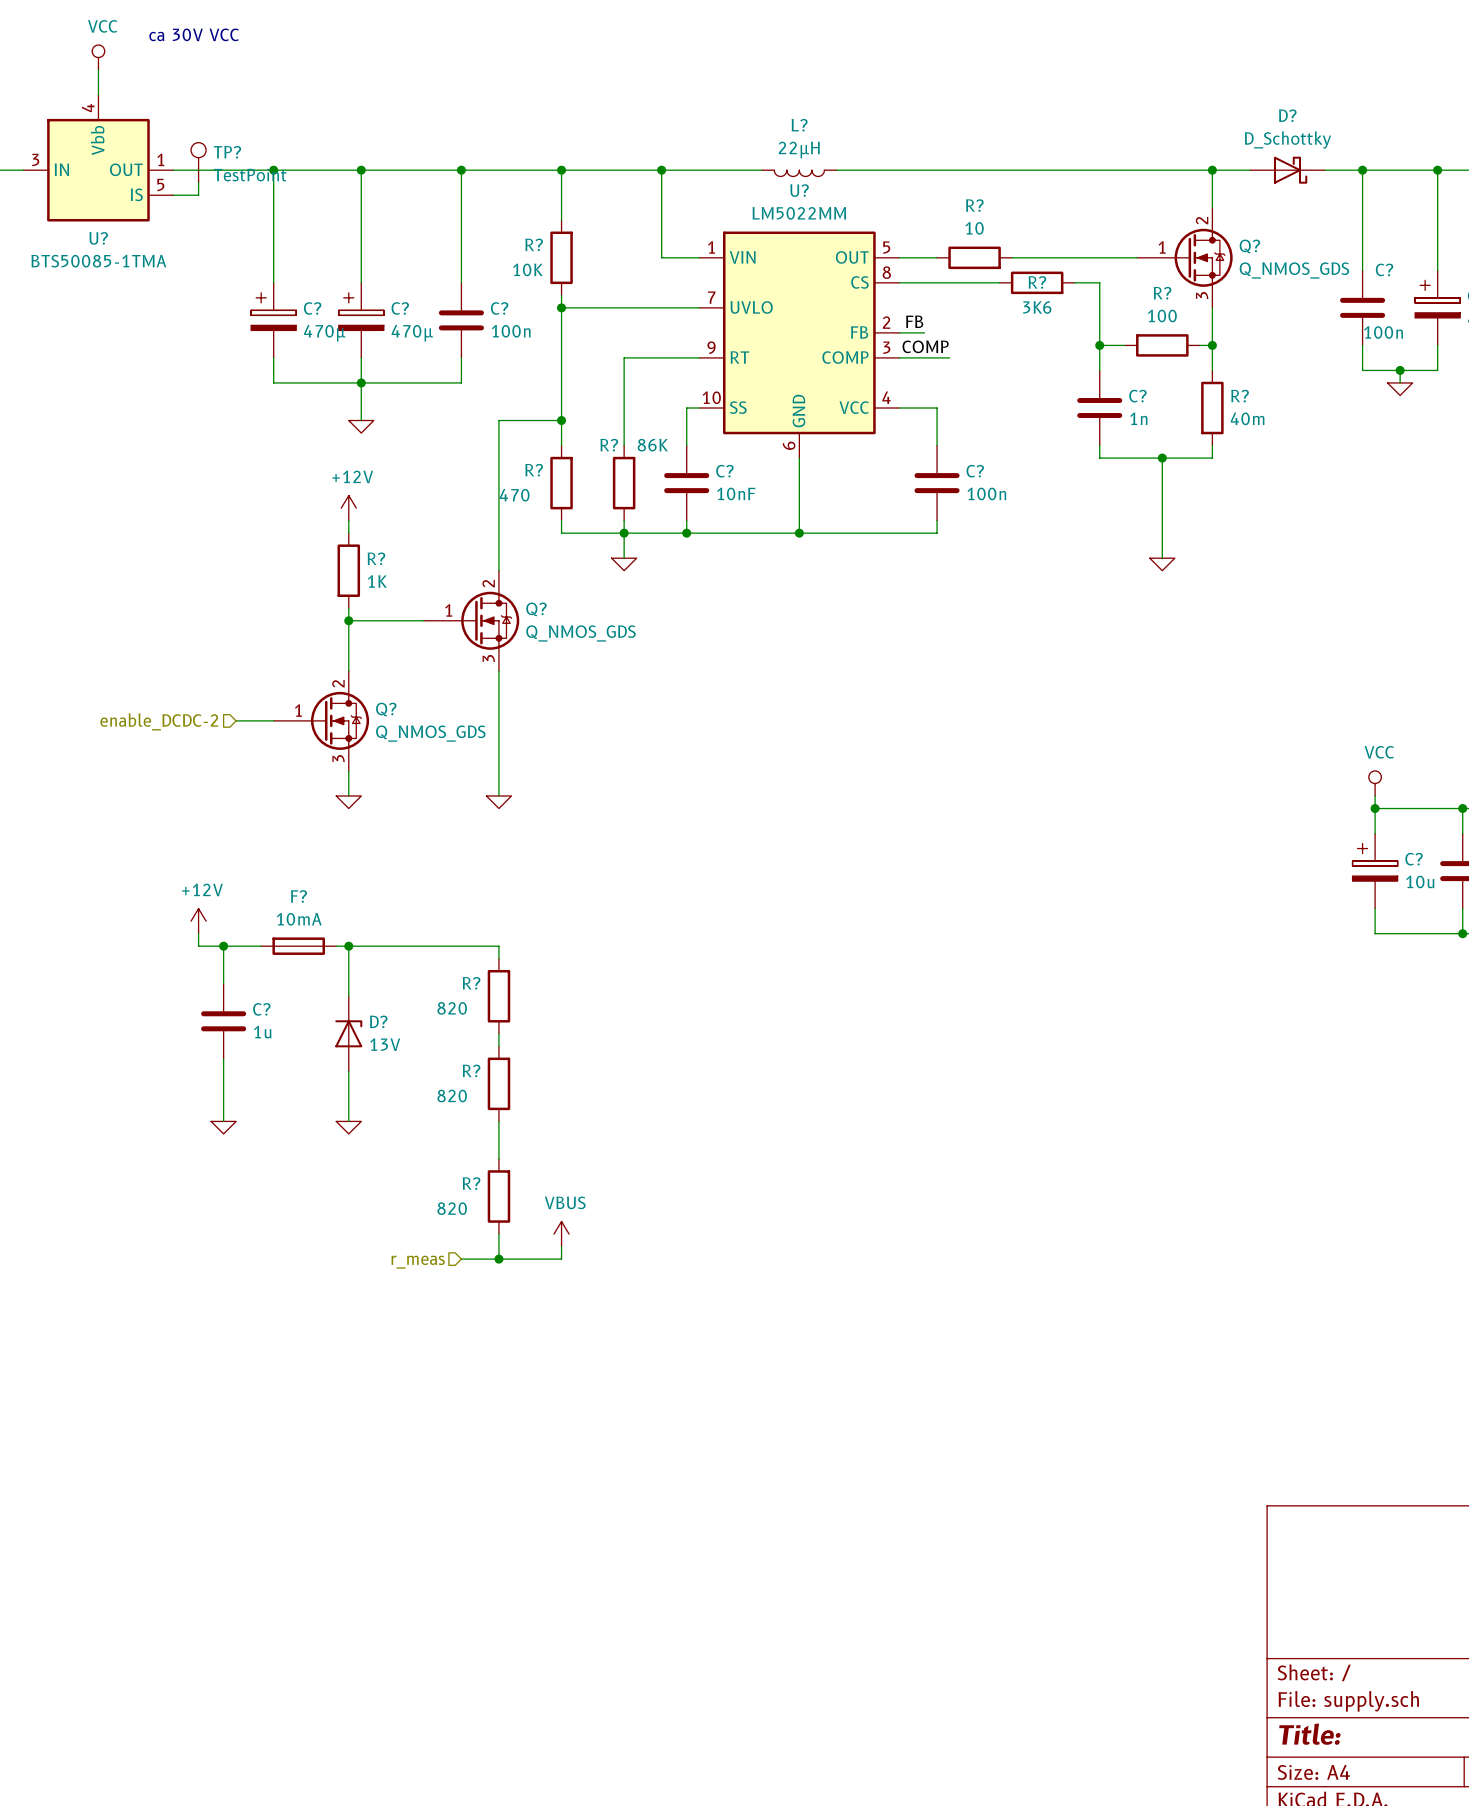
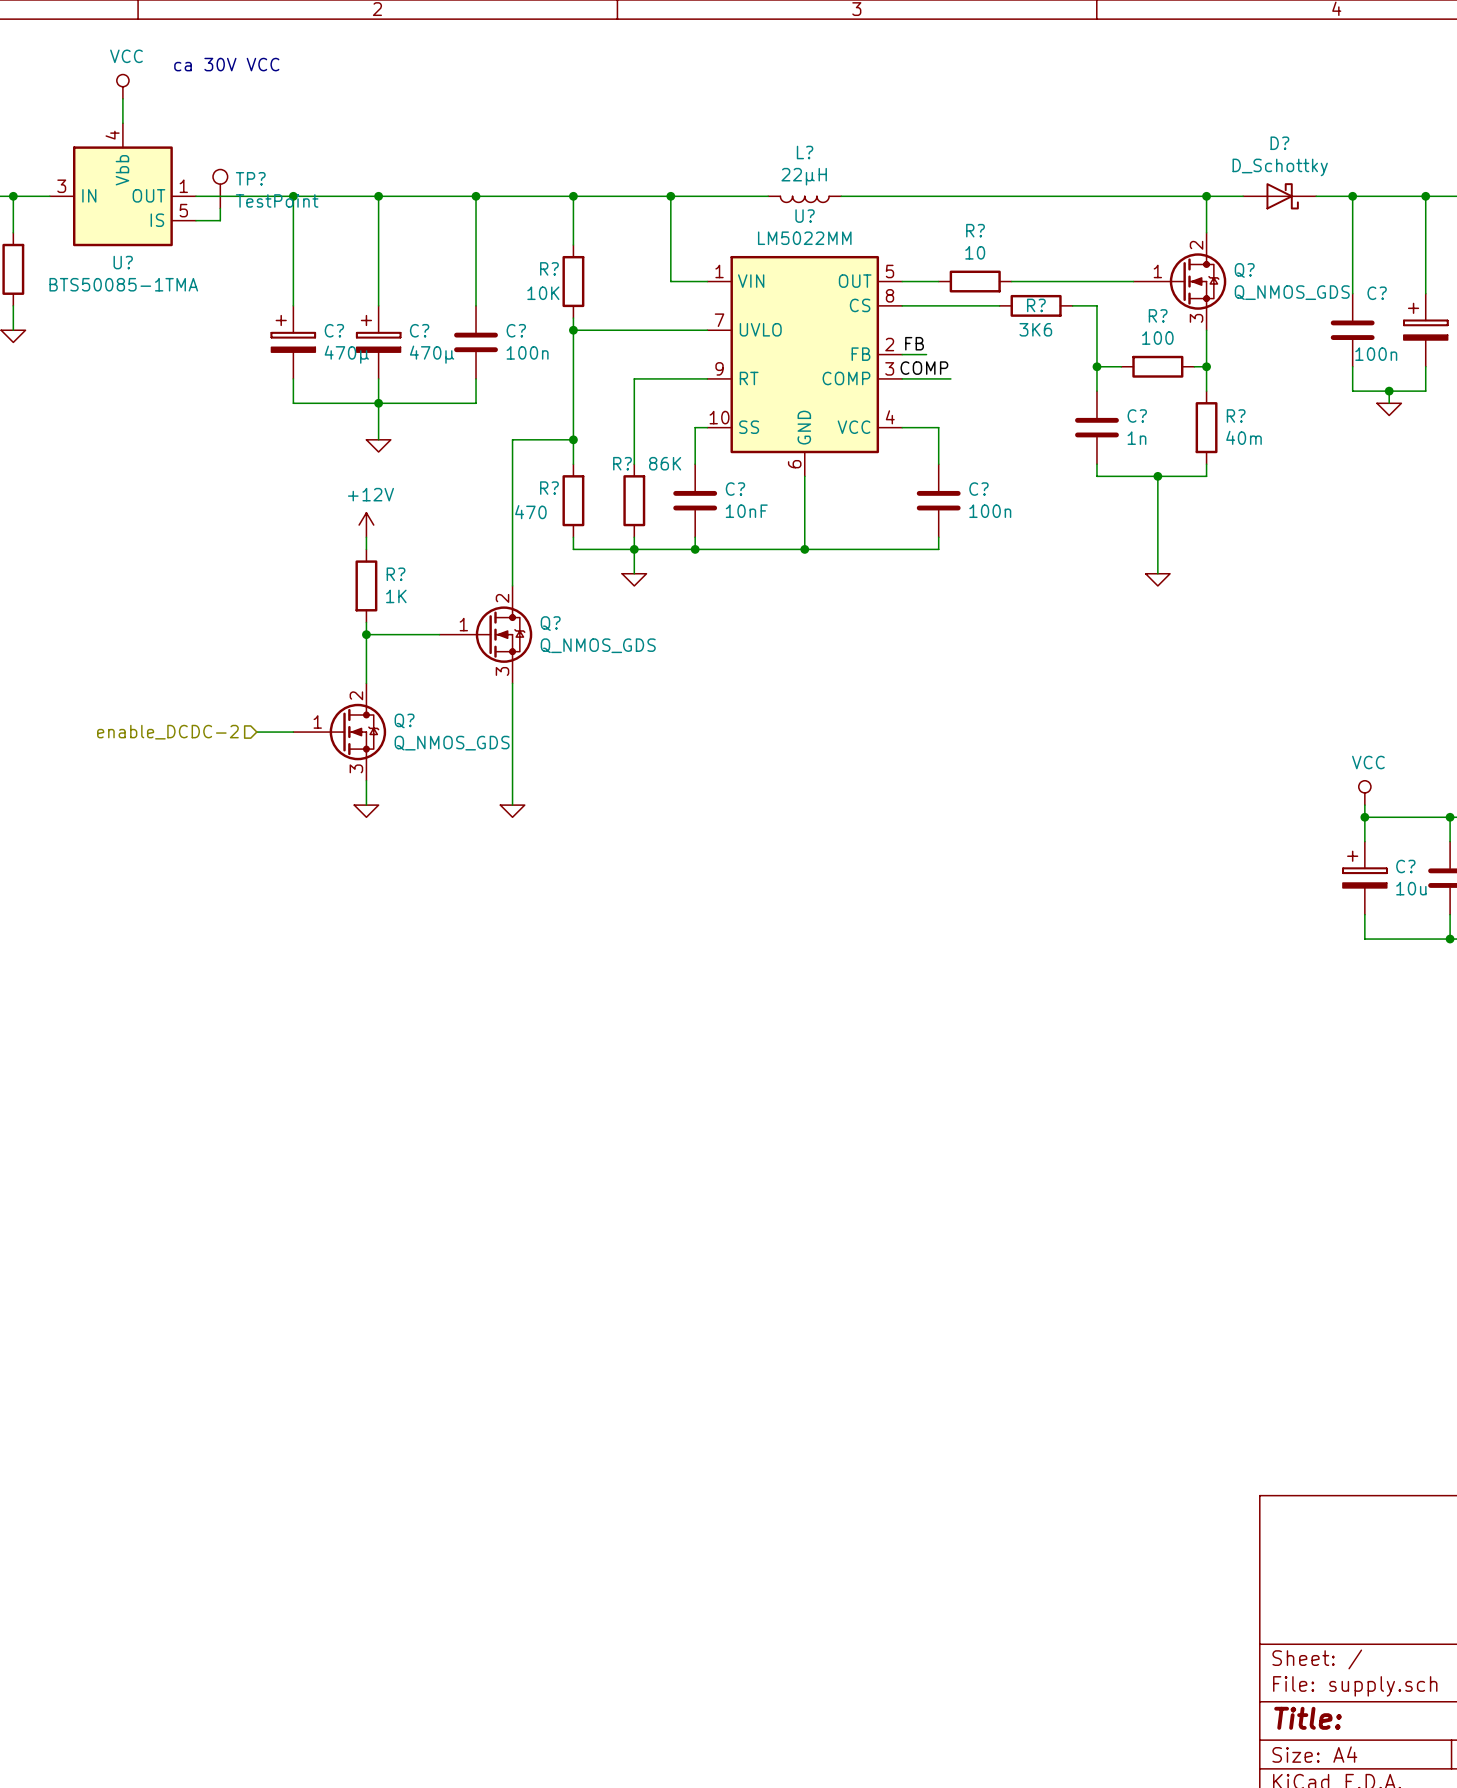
power symbol: +12V (198, 921) -> none
wire: (198, 933) (198, 946) (261, 946) -> none
wire: (223, 946) (223, 983) -> none
junction: (223, 946) -> none
F?: 10mA (298, 946) -> none
wire: (336, 946) (498, 946) (498, 958) -> none
wire: (348, 946) (348, 996) -> none
junction: (348, 946) -> none
R?: 820 (498, 996) -> none
C?: 1u (223, 1021) -> none
D?: 13V (348, 1033) -> none
wire: (498, 1033) (498, 1046) -> none
wire: (223, 1058) (223, 1121) -> none
wire: (348, 1071) (348, 1121) -> none
R?: 820 (498, 1083) -> none
wire: (498, 1121) (498, 1158) -> none
power symbol: (223, 1127) -> none
power symbol: (348, 1127) -> none
R?: 820 (498, 1196) -> none
wire: (498, 1234) (498, 1259) -> none
power symbol: VBUS (561, 1234) -> none
wire: (561, 1246) (561, 1259) (461, 1259) -> none
junction: (498, 1259) -> none
hierarchical label: r_meas (418, 1262) -> none

